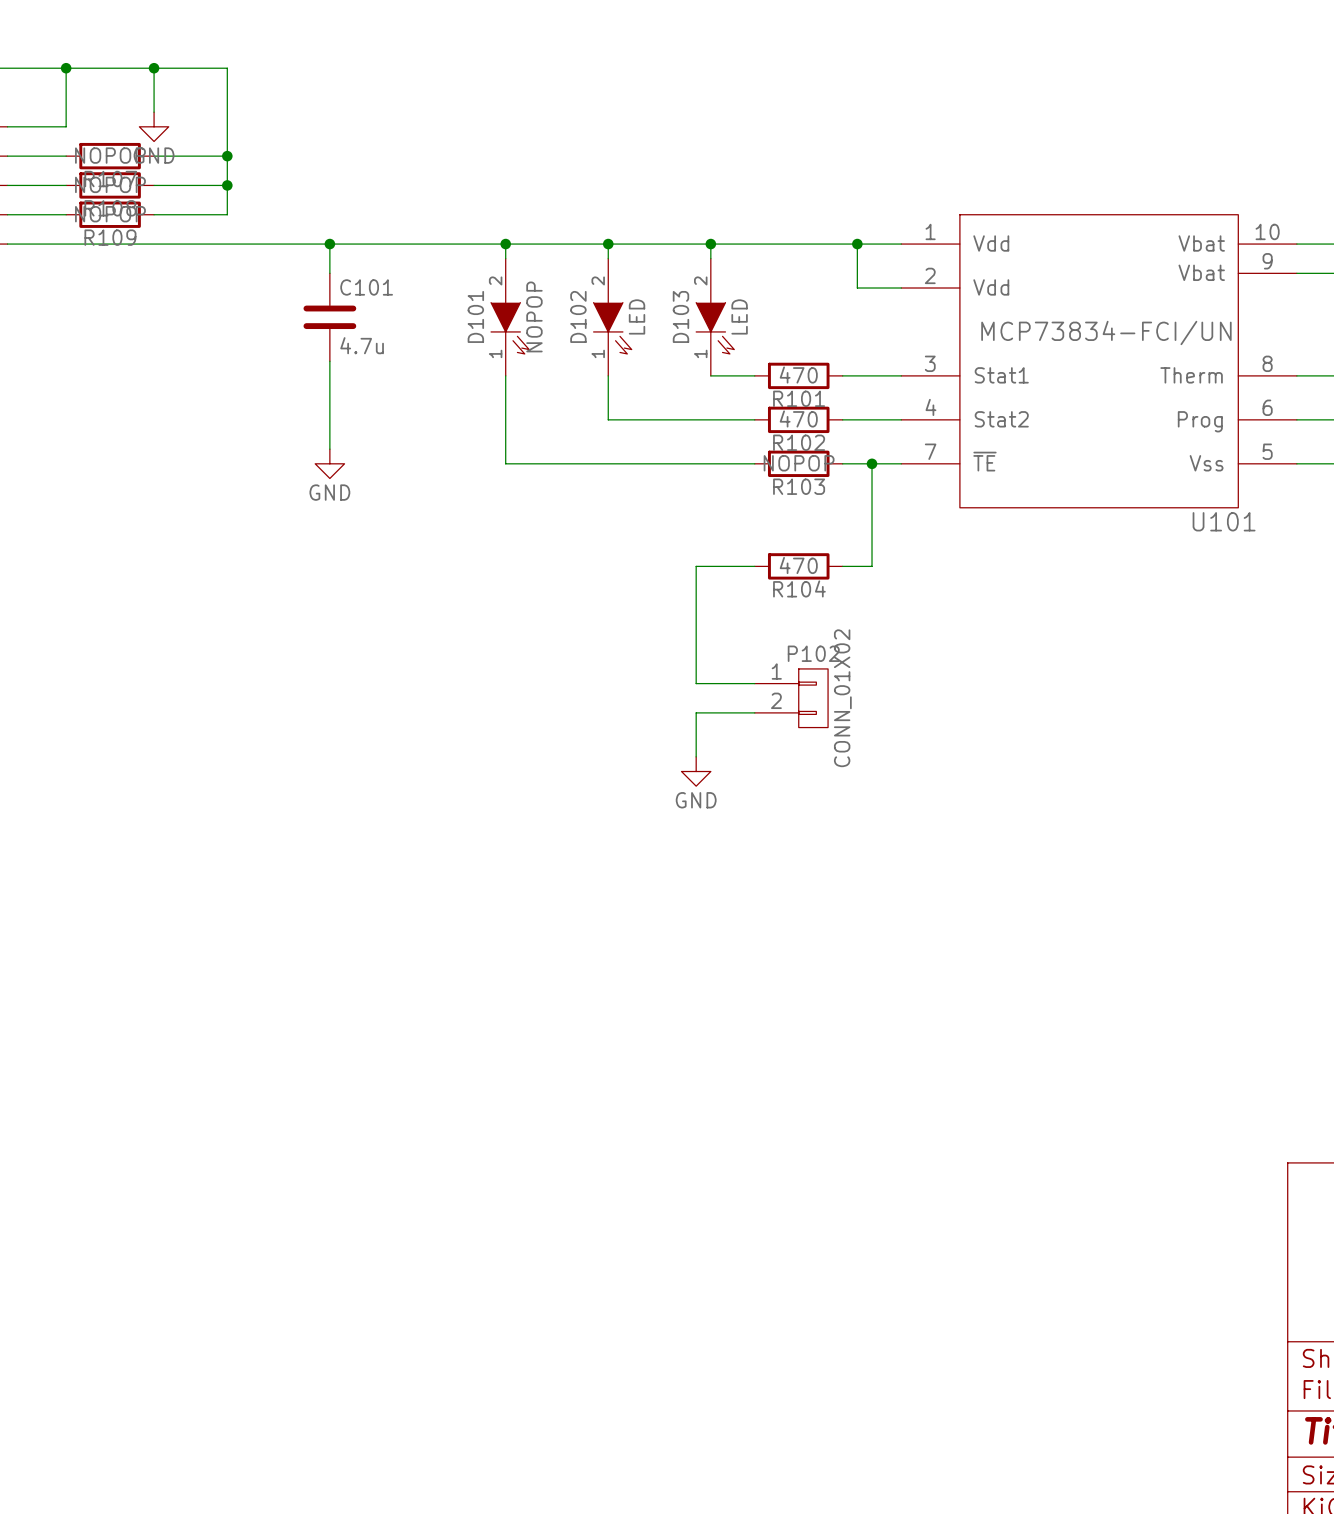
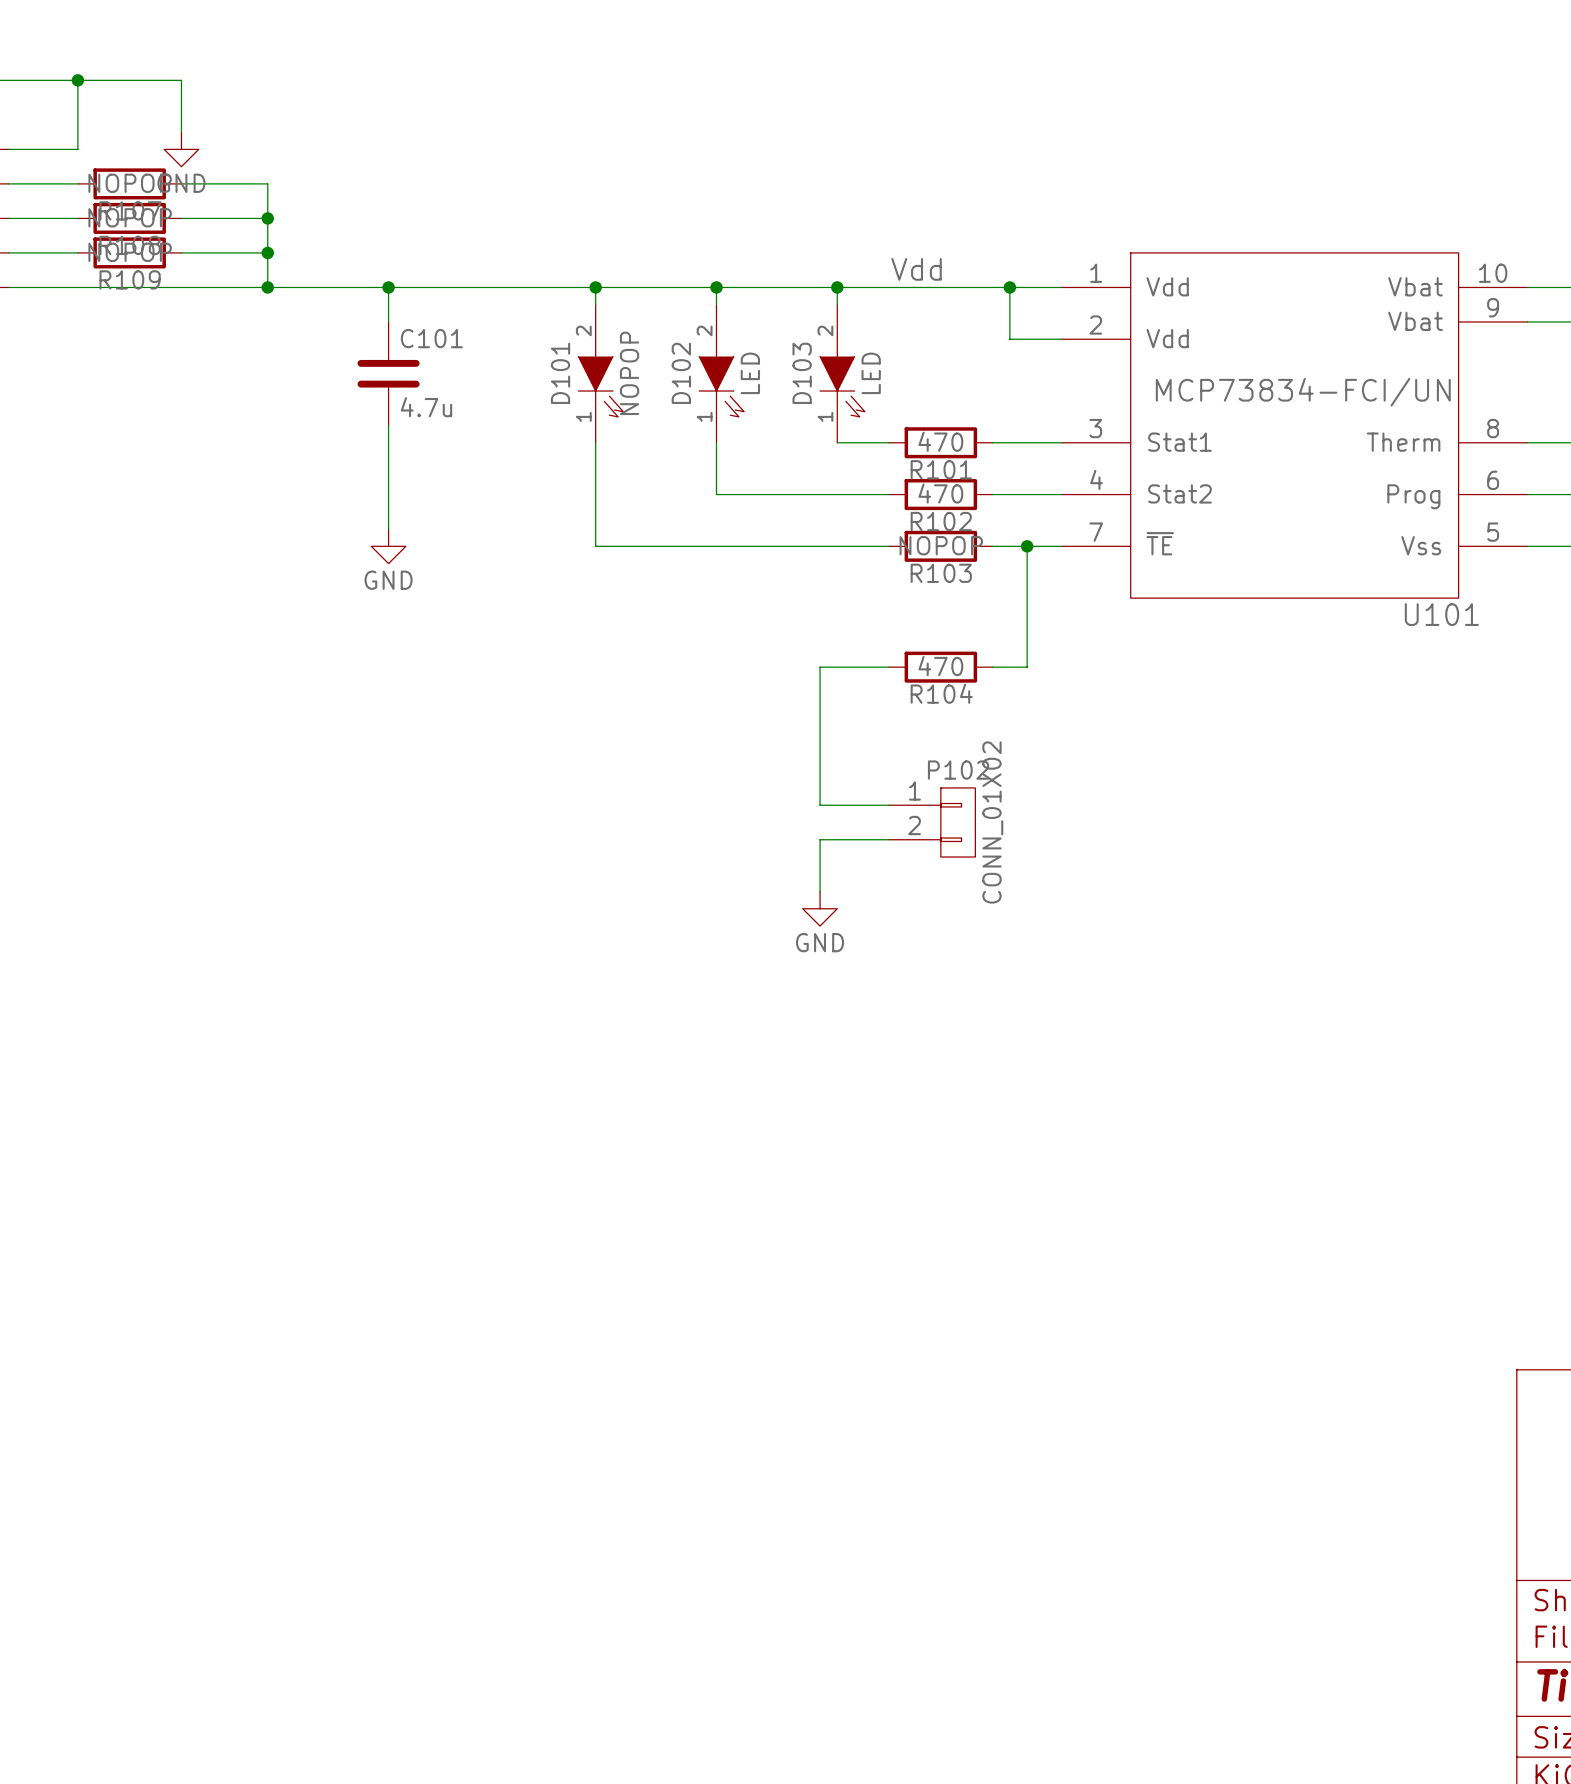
wire: (154, 68) (227, 68) (227, 156) -> none
junction: (154, 68) -> none
junction: (227, 156) -> none
wire: none -> (267, 252) (267, 287)
junction: none -> (267, 252)
label: none -> Vdd (916, 269)
junction: none -> (267, 287)

